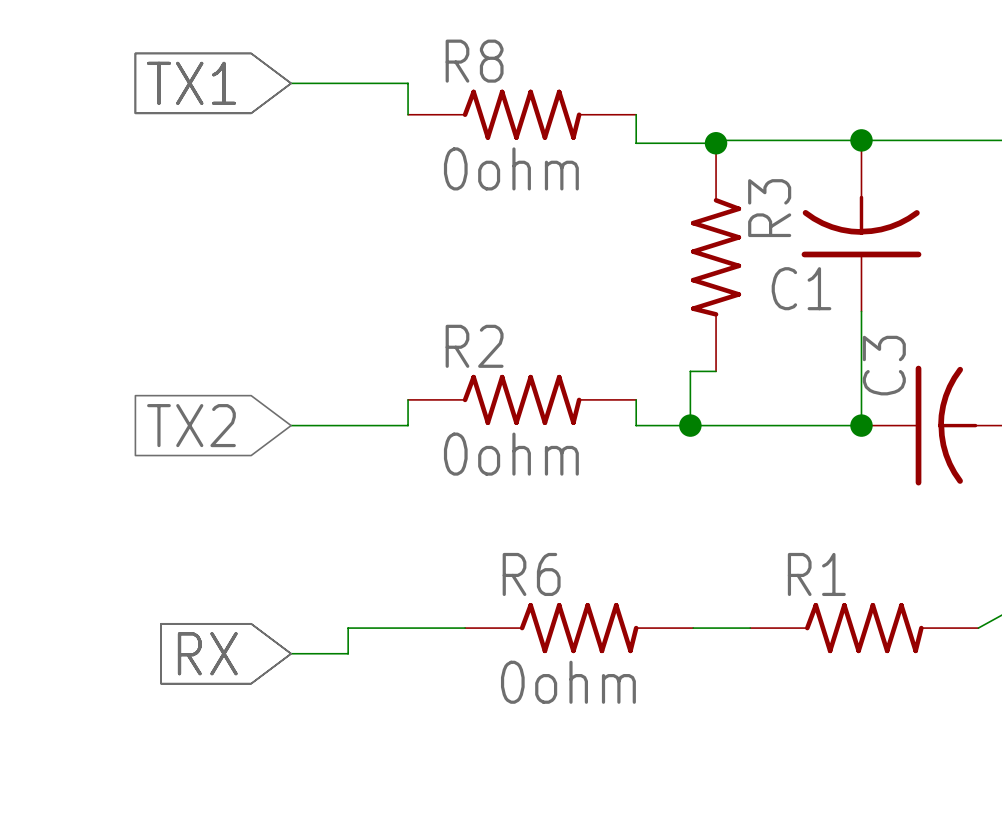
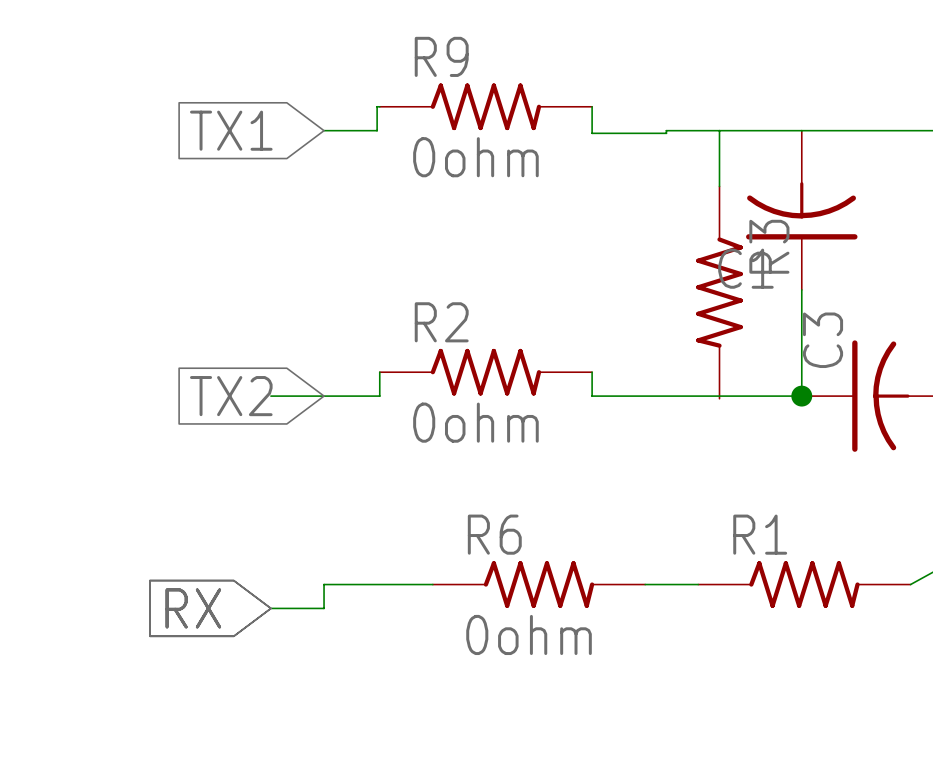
R8 name: R8 (474, 61) -> R9 (441, 56)
global label position: TX1 (191, 83) -> TX1 (231, 130)
wire: (291, 83) (408, 83) (408, 114) -> (324, 130) (377, 130) (377, 106) (379, 106)
wire: none -> (719, 130) (719, 186)
junction: (861, 140) -> none
junction: (716, 143) -> none
R3 position: (716, 257) -> (719, 292)
wire: (716, 371) (690, 371) (690, 425) -> none
global label position: TX2 (191, 425) -> TX2 (231, 396)
junction: (690, 425) -> none

